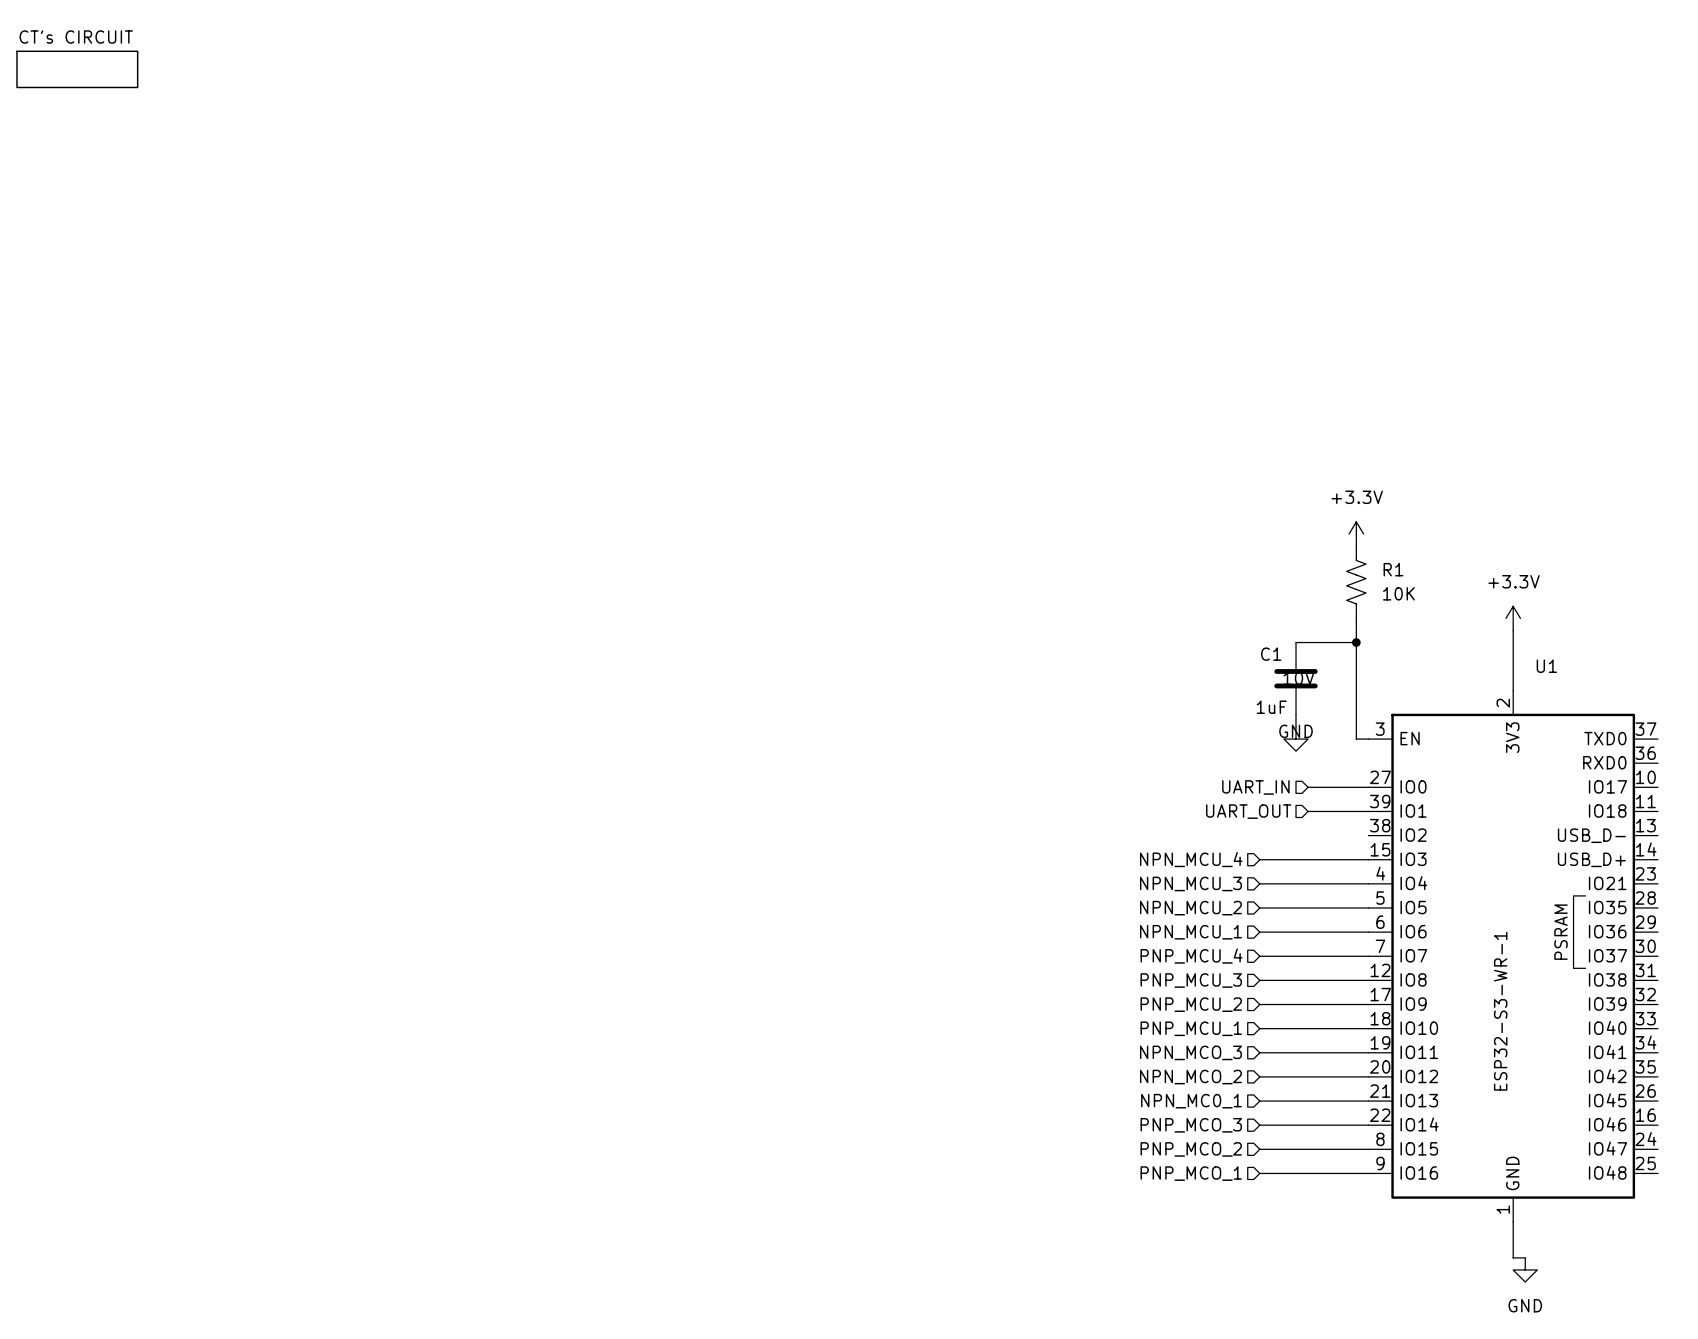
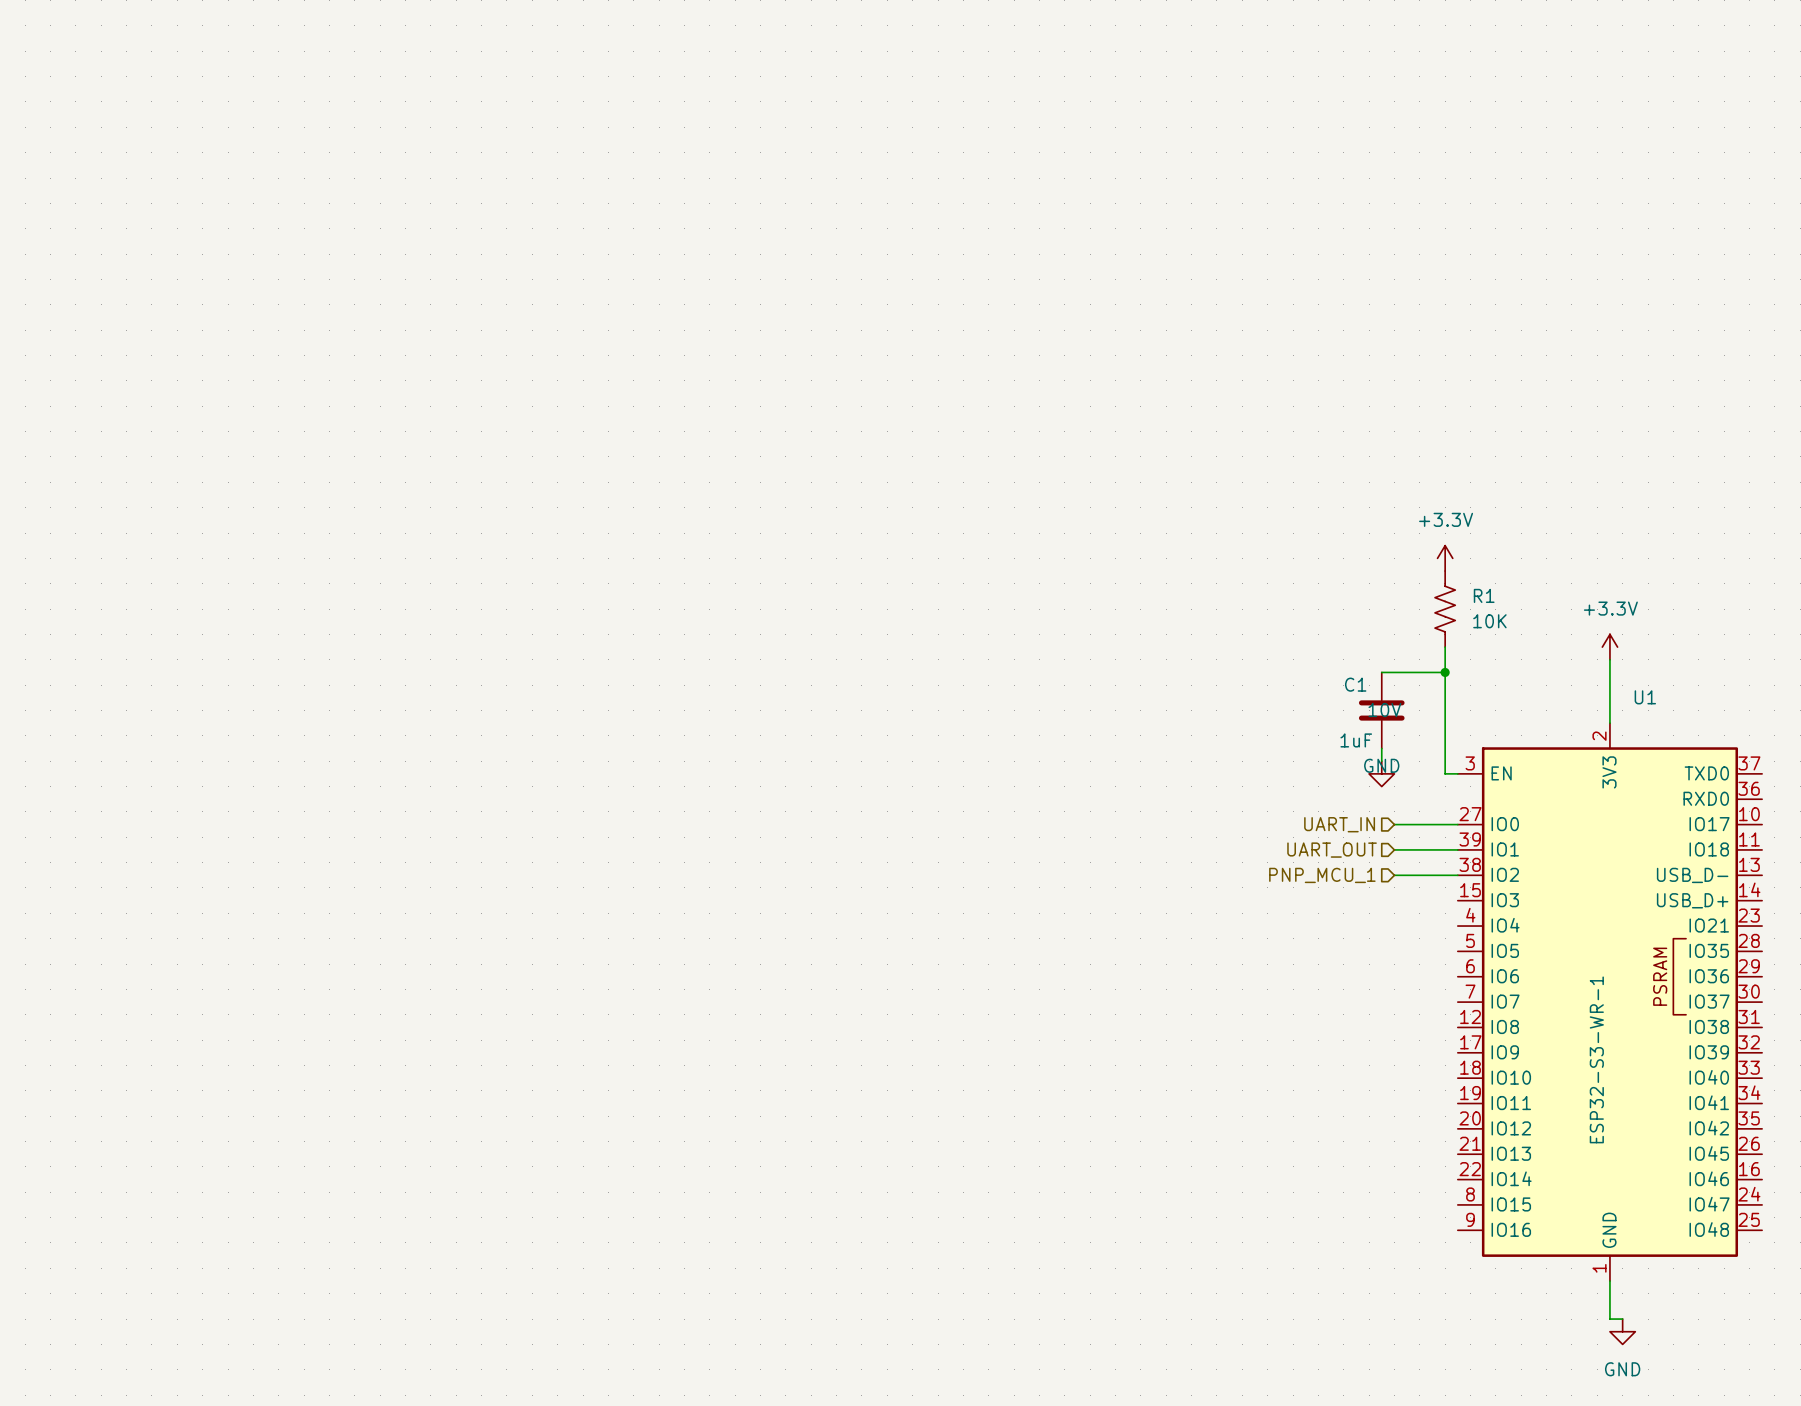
sheet CT's CIRCUIT: (77, 69) -> none
wire: none -> (1394, 875) (1457, 875)
hierarchical label: NPN_MCU_4 (1191, 859) -> none
wire: (1259, 859) (1368, 859) -> none
hierarchical label: NPN_MCU_3 (1190, 883) -> none
wire: (1259, 883) (1368, 883) -> none
wire: (1259, 907) (1368, 907) -> none
hierarchical label: NPN_MCU_2 (1190, 908) -> none
hierarchical label: NPN_MCU_1 (1190, 932) -> none
wire: (1259, 932) (1368, 932) -> none
hierarchical label: PNP_MCU_4 (1191, 956) -> none
wire: (1259, 956) (1368, 956) -> none
hierarchical label: PNP_MCU_3 (1191, 980) -> none
wire: (1259, 980) (1368, 980) -> none
hierarchical label: PNP_MCU_2 (1191, 1004) -> none
wire: (1259, 1004) (1368, 1004) -> none
hierarchical label position: PNP_MCU_1 (1191, 1028) -> PNP_MCU_1 (1322, 875)
wire: (1259, 1028) (1368, 1028) -> none
hierarchical label: NPN_MCO_3 (1190, 1052) -> none
wire: (1259, 1052) (1368, 1052) -> none
wire: (1259, 1076) (1368, 1076) -> none
hierarchical label: NPN_MCO_2 (1190, 1077) -> none
hierarchical label: NPN_MC0_1 (1191, 1101) -> none
wire: (1259, 1101) (1368, 1101) -> none
hierarchical label: PNP_MCO_3 (1191, 1125) -> none
wire: (1259, 1125) (1368, 1125) -> none
hierarchical label: PNP_MCO_2 (1191, 1149) -> none
wire: (1259, 1149) (1368, 1149) -> none
hierarchical label: PNP_MCO_1 (1191, 1173) -> none
wire: (1259, 1173) (1368, 1173) -> none

